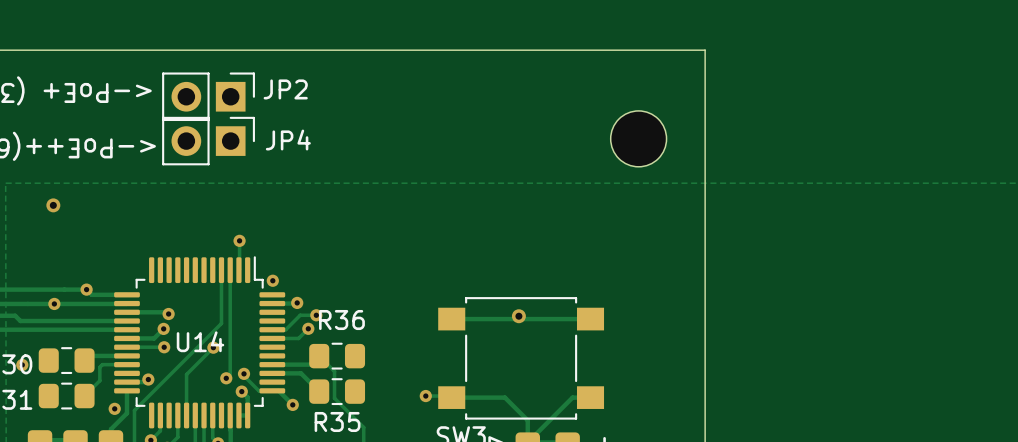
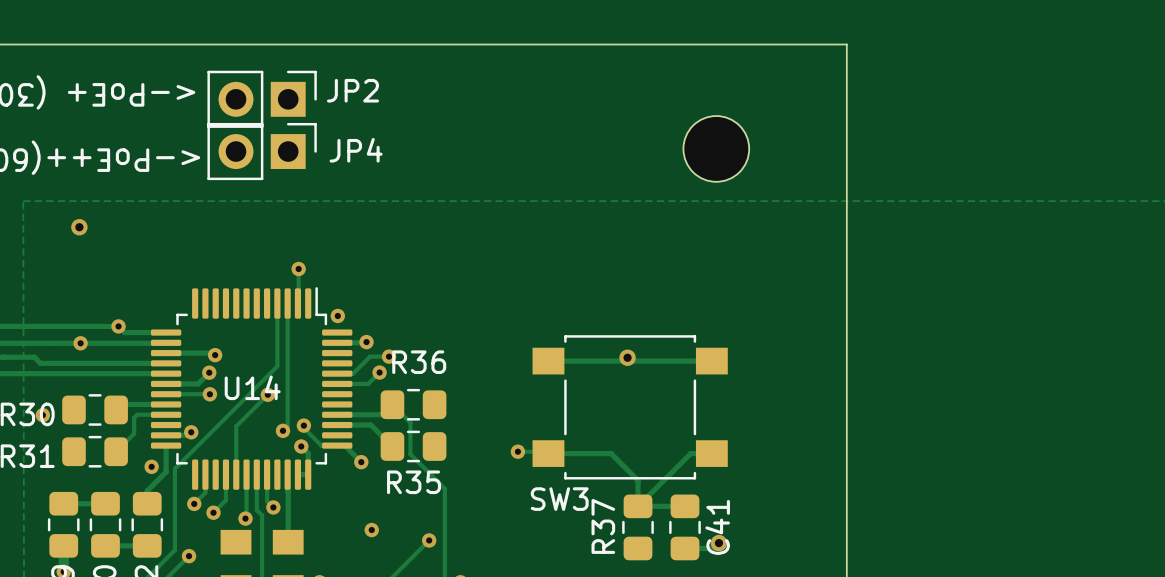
part position: (638, 138) -> (716, 148)

